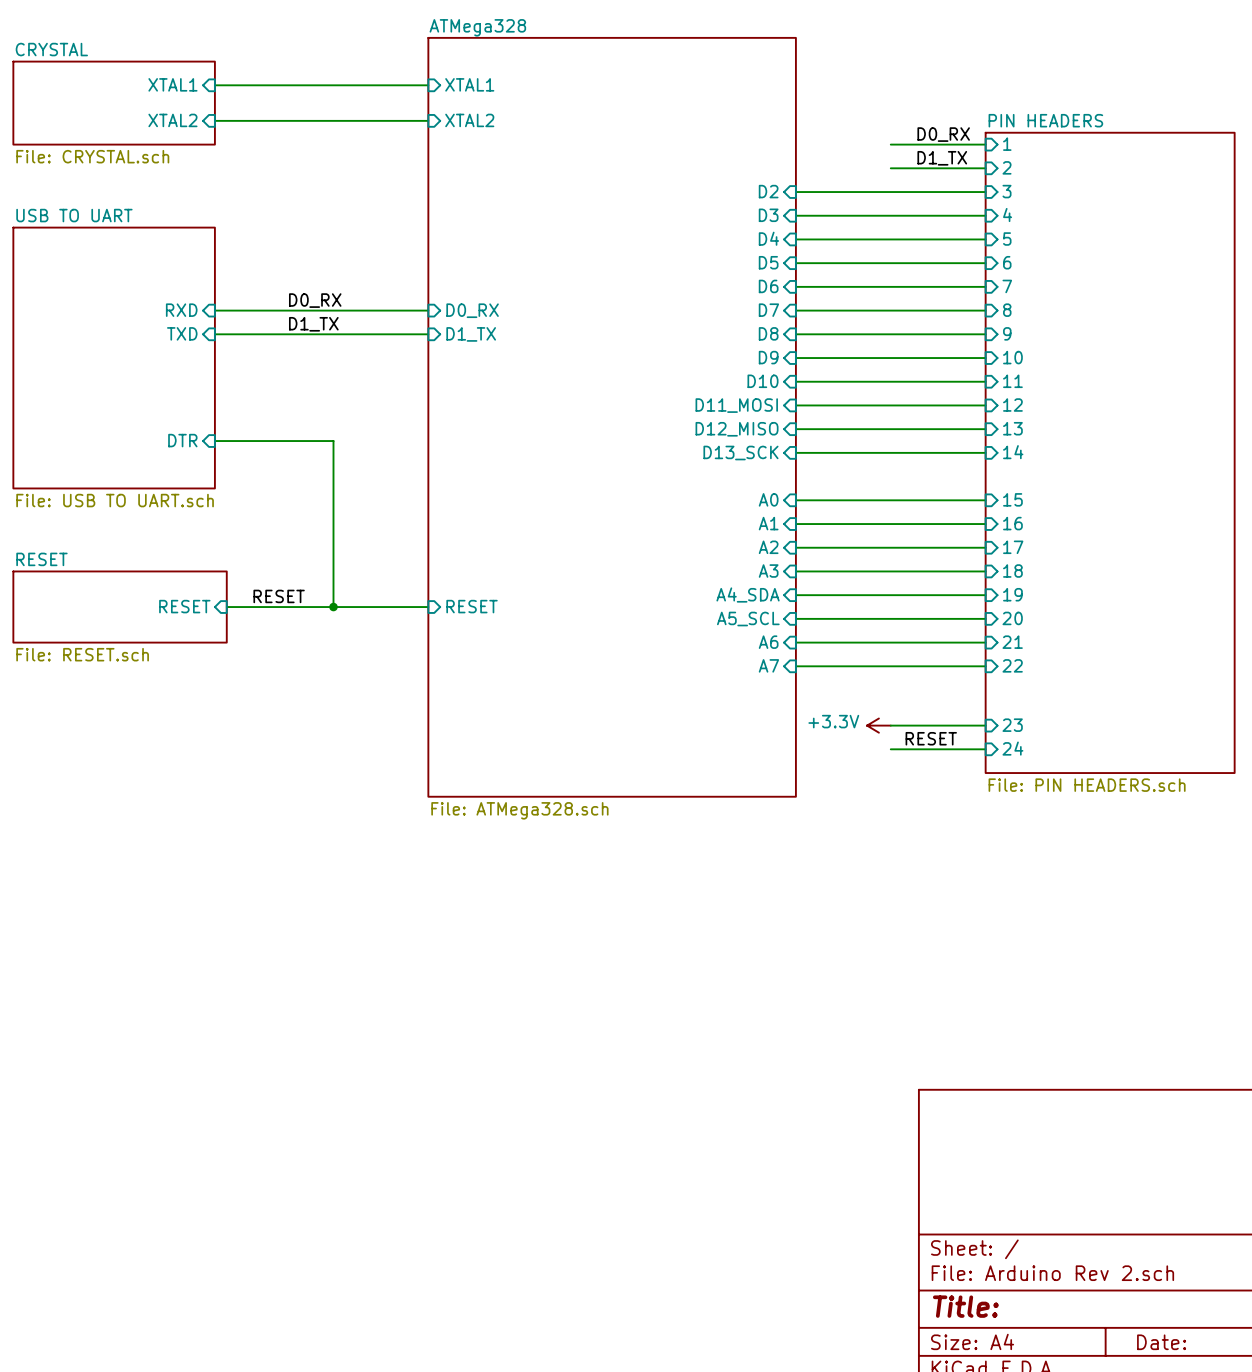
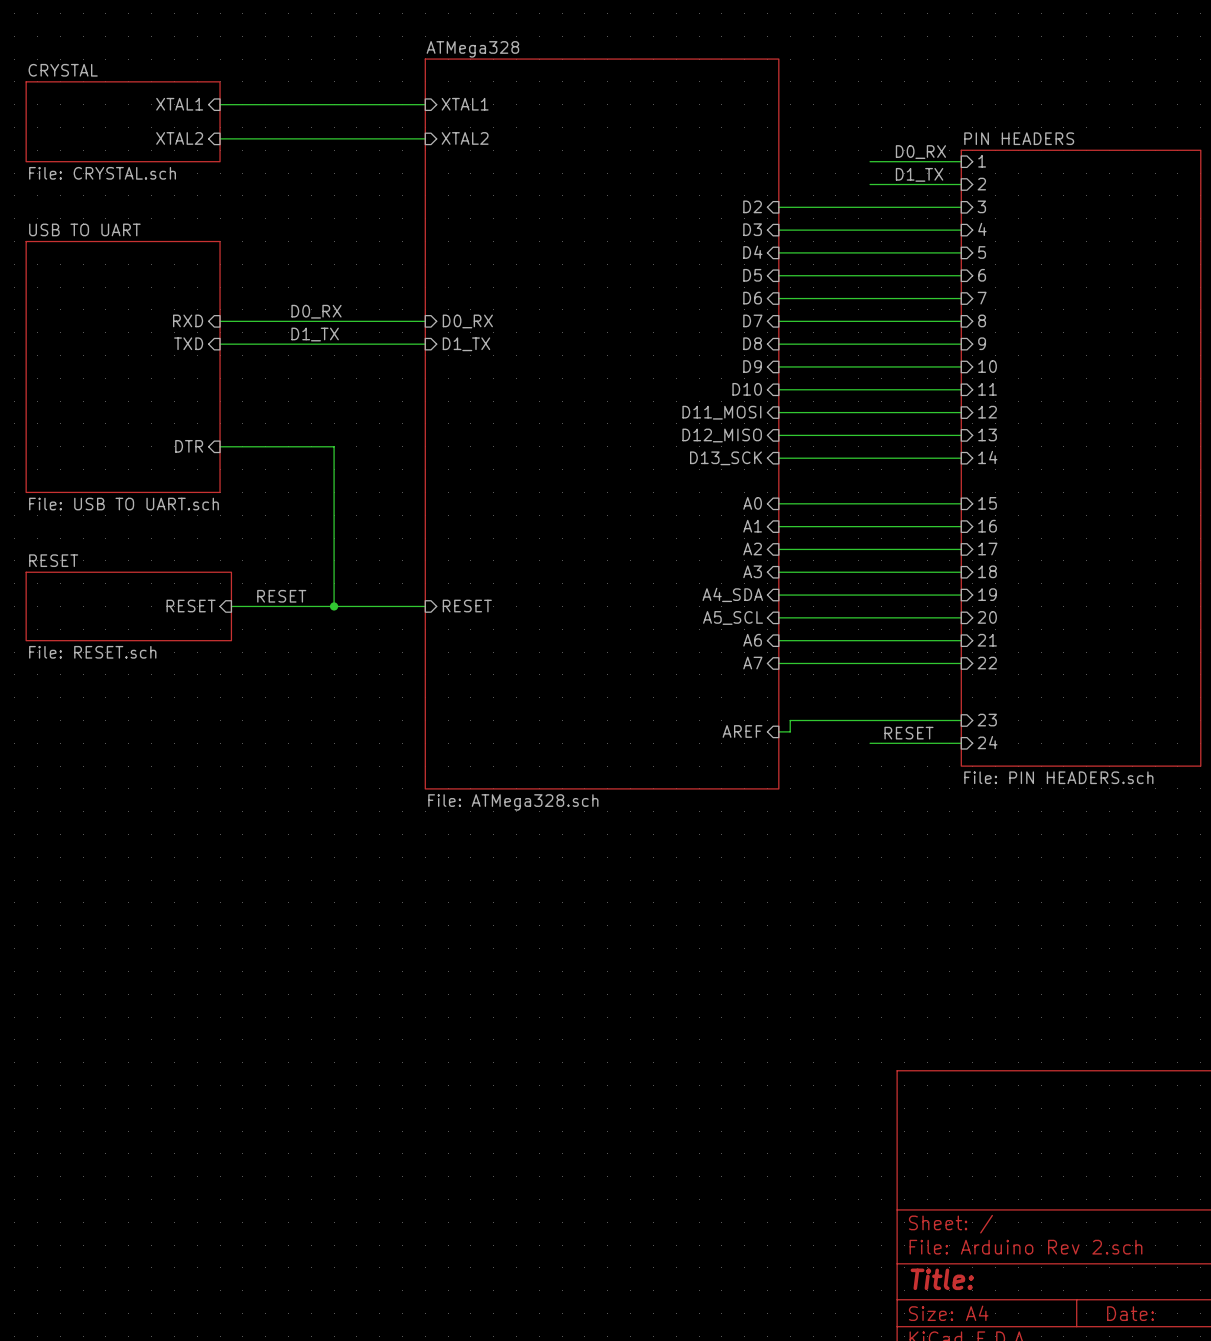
power symbol: +3.3V (878, 725) -> none
wire: none -> (870, 720) (790, 720) (790, 731) (778, 731)
sheet pin: none -> AREF (742, 731)

